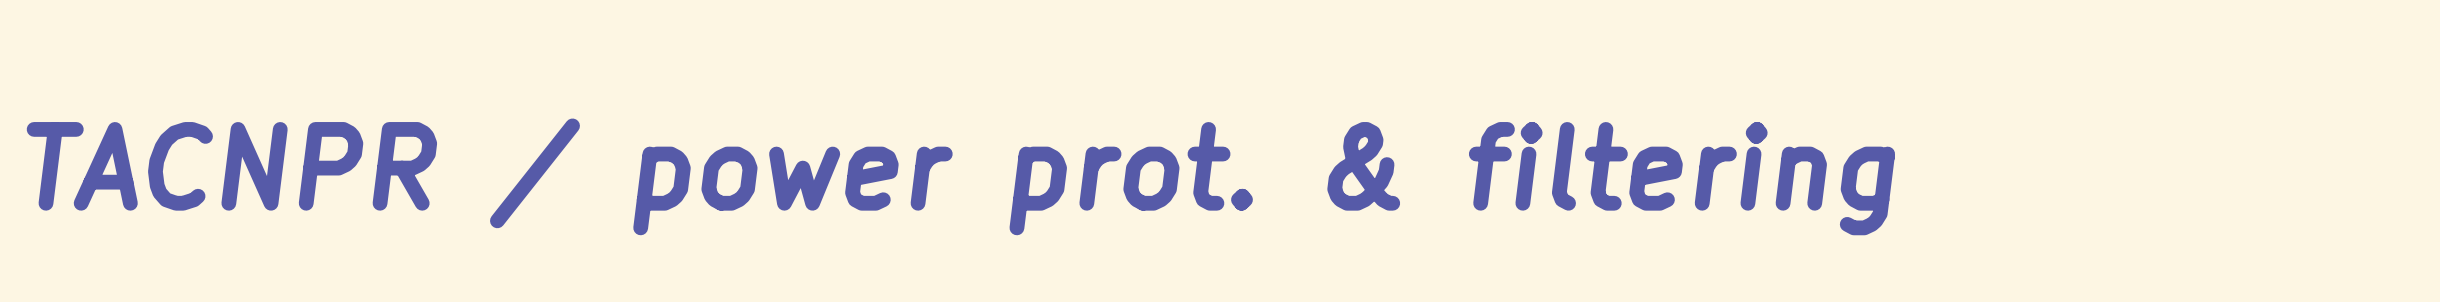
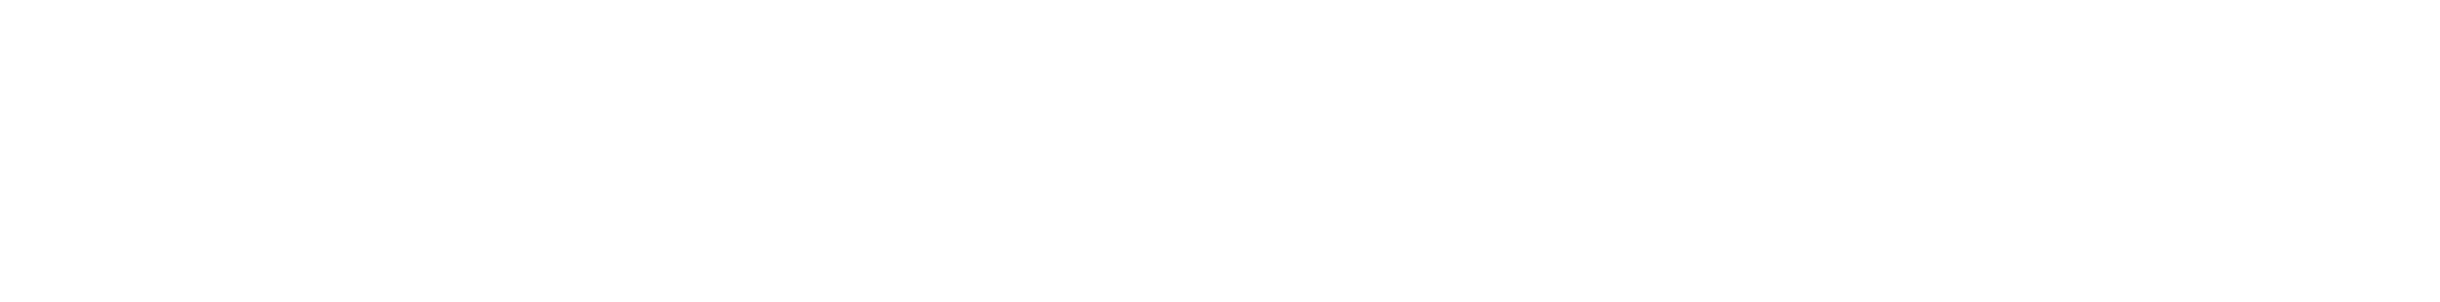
text: TACNPR / power prot. & filtering (960, 176) -> none

